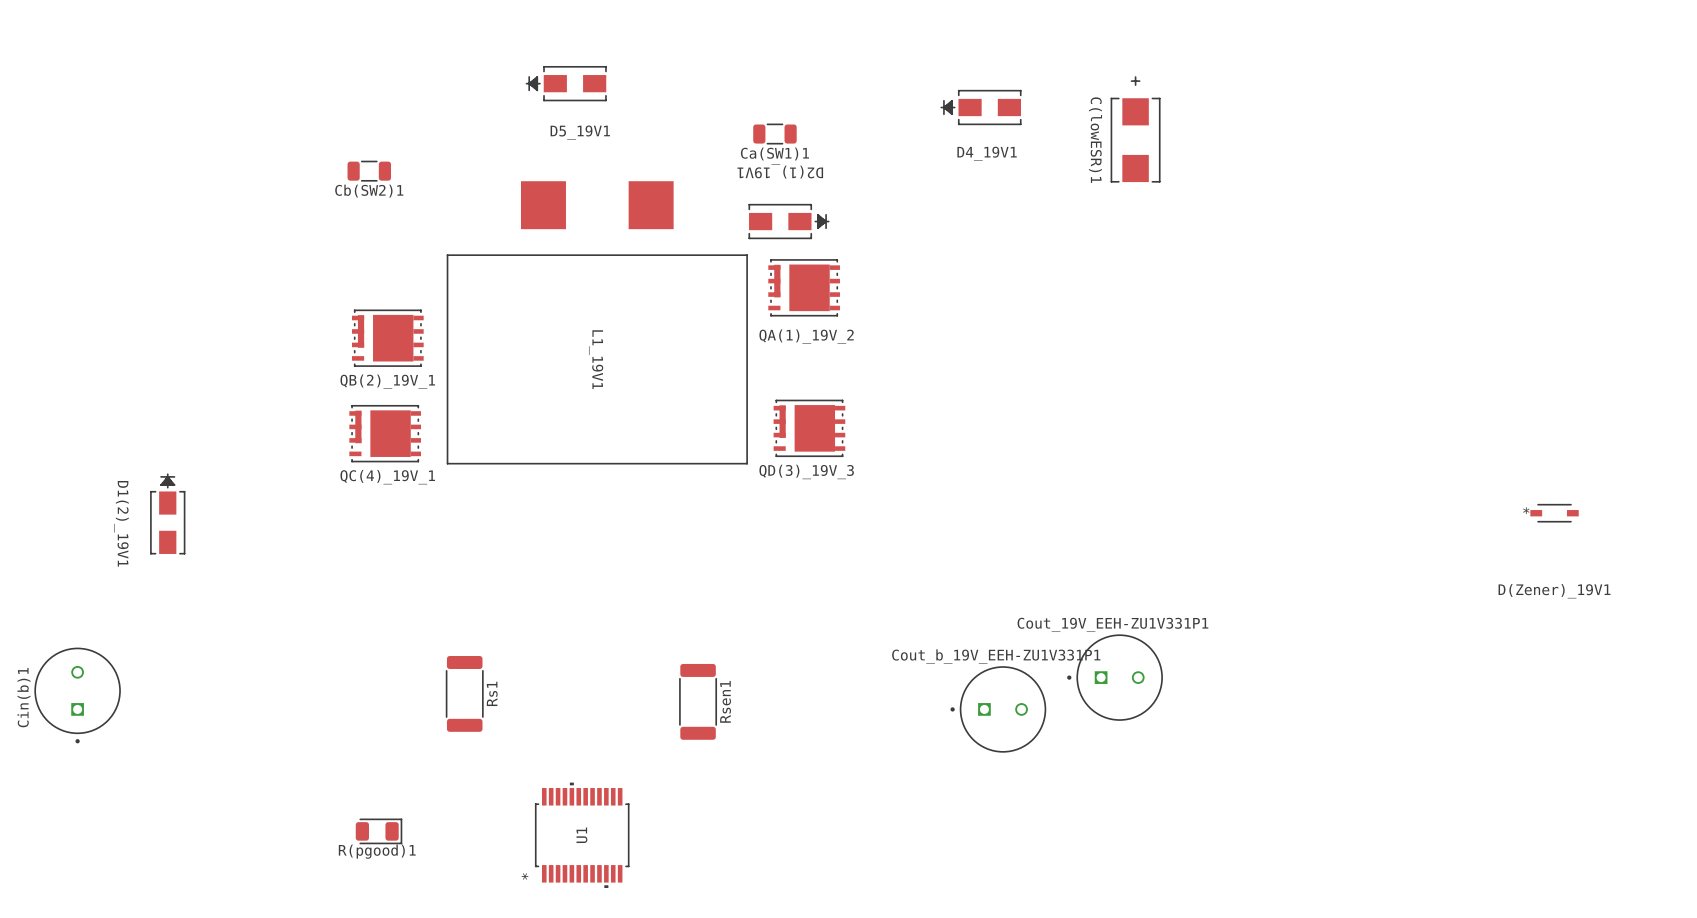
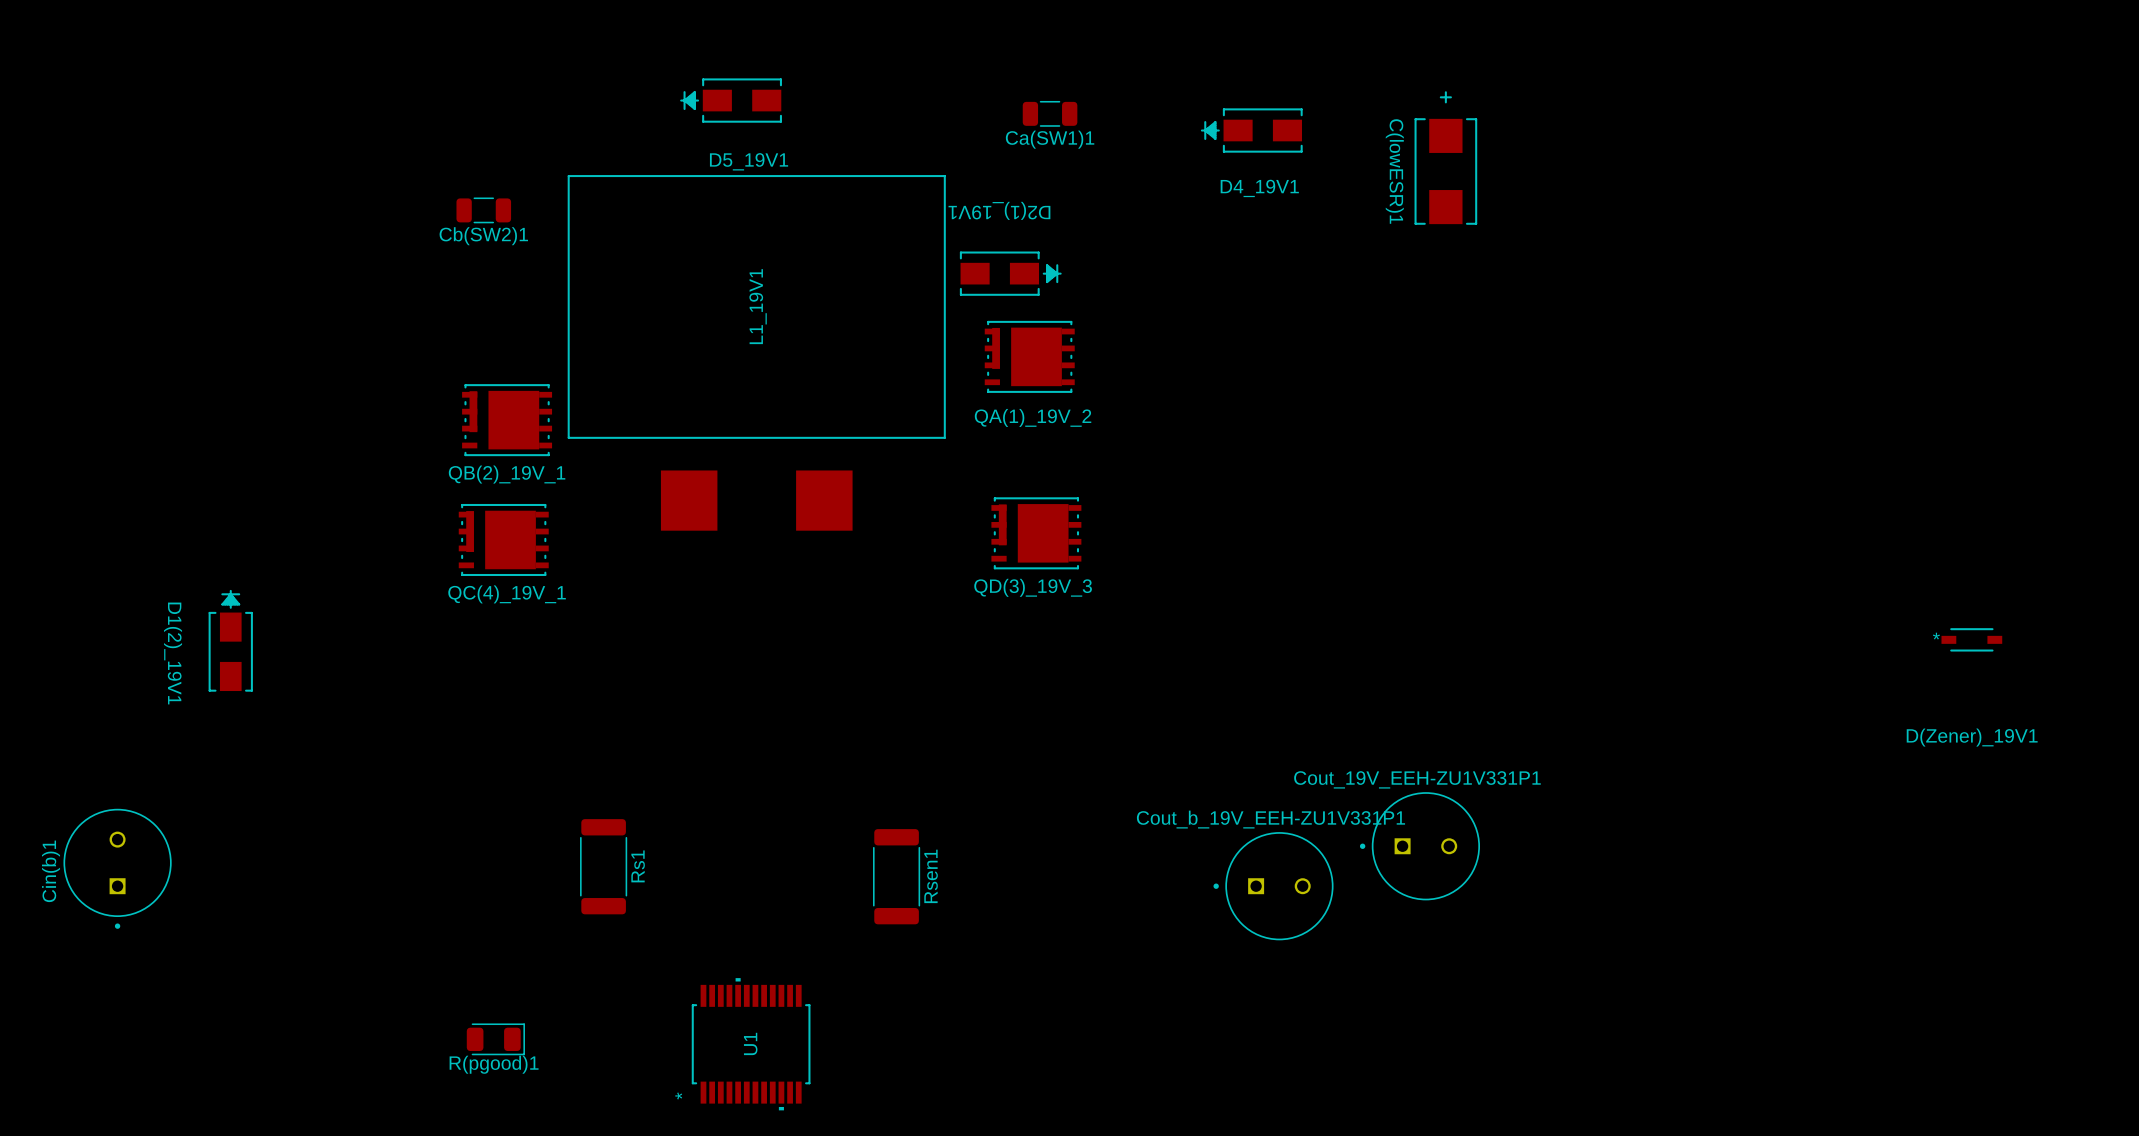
Ca(SW1)1 position: (774, 134) -> (1050, 113)
L1_19V1 rotation: 0° (597, 322) -> 180° (756, 352)

